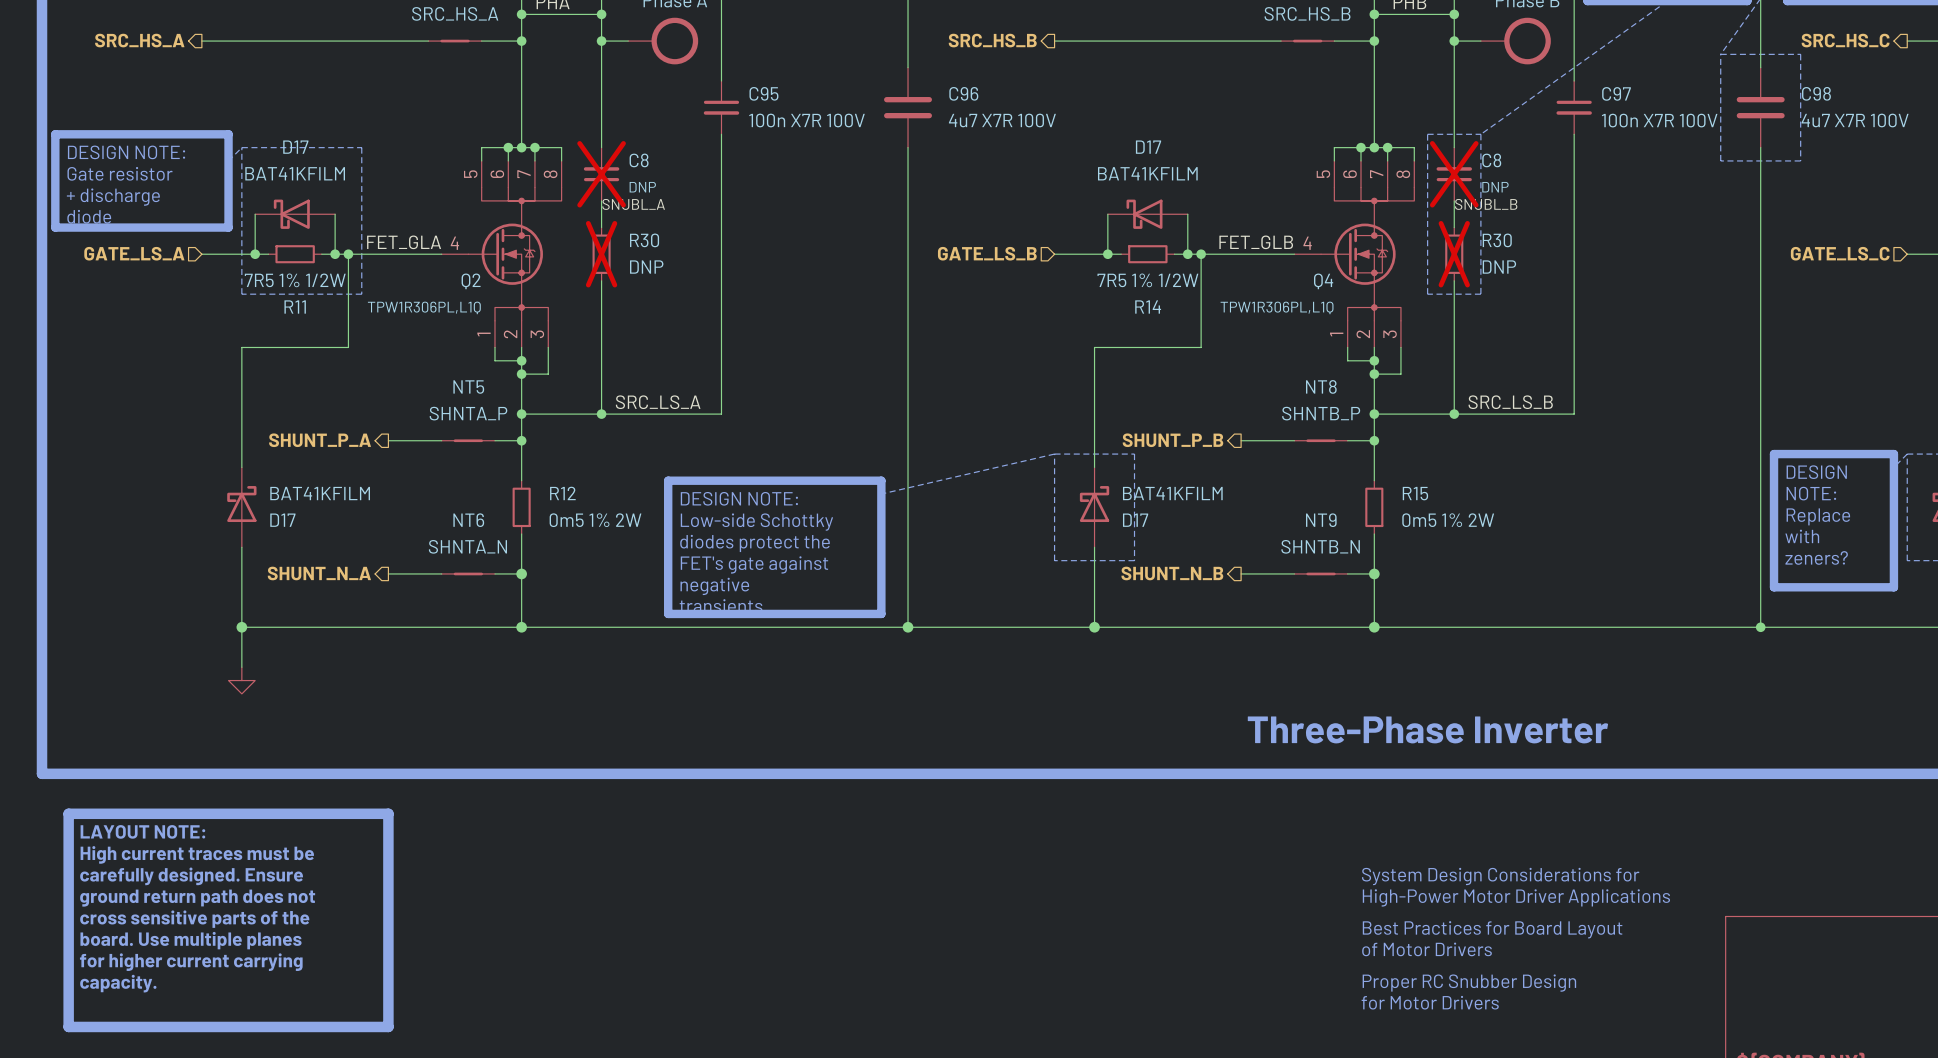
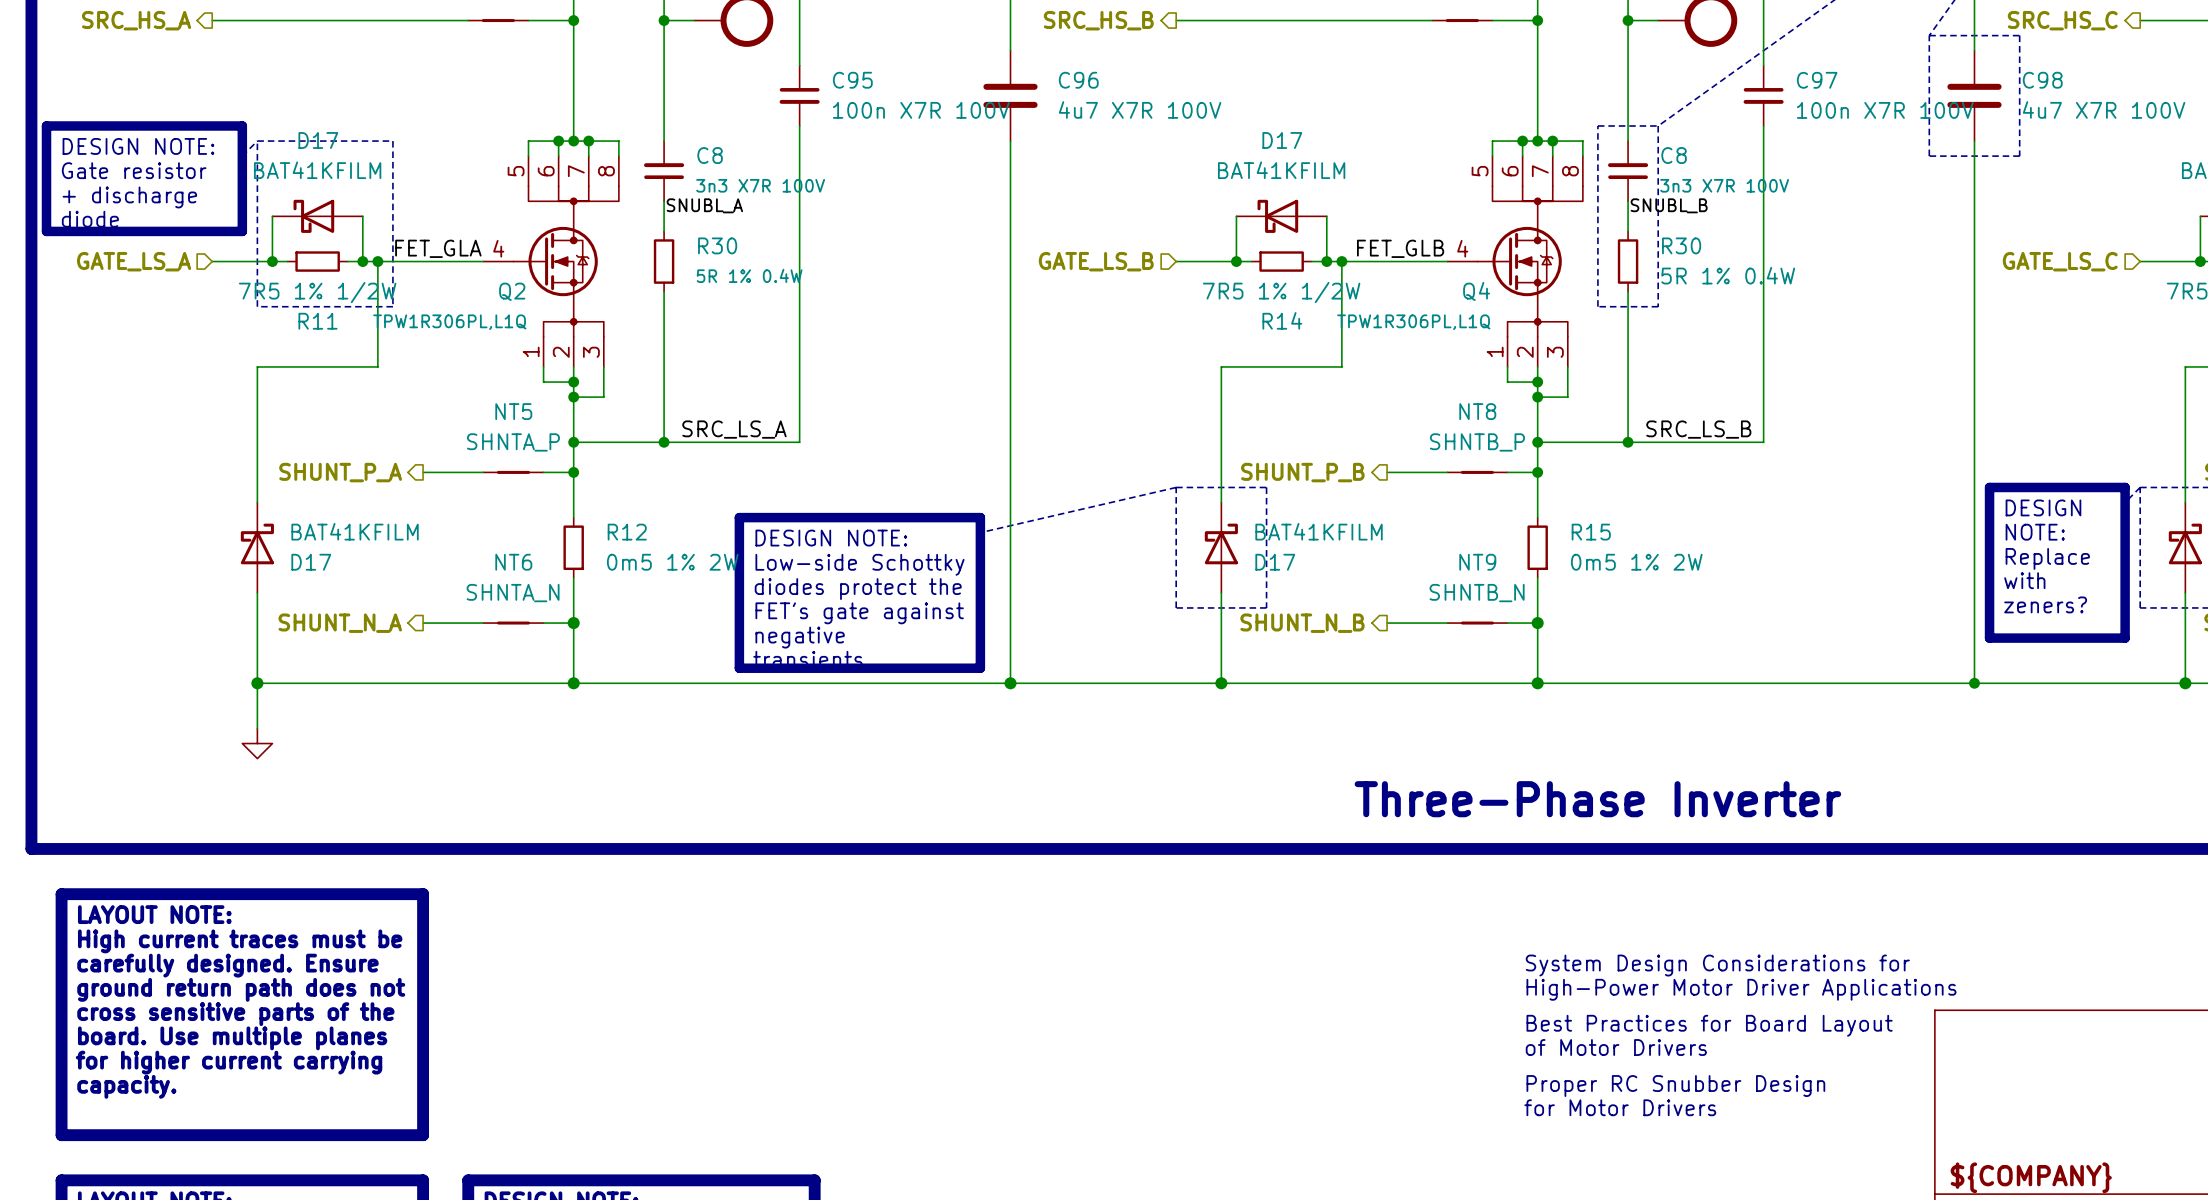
C8 do-not-place cross: (601, 174) -> none
C8 do-not-place cross: (1454, 174) -> none
C8 value: DNP (642, 187) -> 3n3 X7R 100V (760, 185)
C8 value: DNP (1495, 187) -> 3n3 X7R 100V (1724, 185)
R30 do-not-place cross: (601, 254) -> none
R30 do-not-place cross: (1454, 254) -> none
R30 value: DNP (646, 267) -> 5R 1% 0.4W (749, 275)
R30 value: DNP (1499, 267) -> 5R 1% 0.4W (1728, 275)

